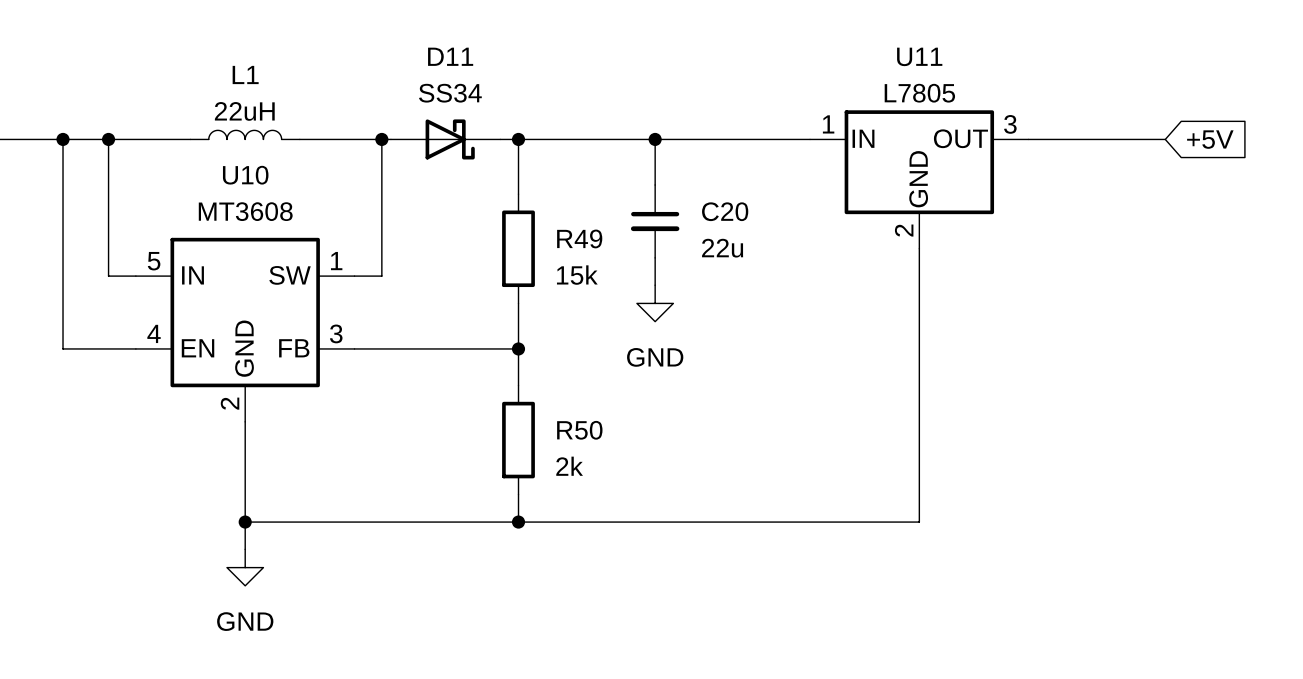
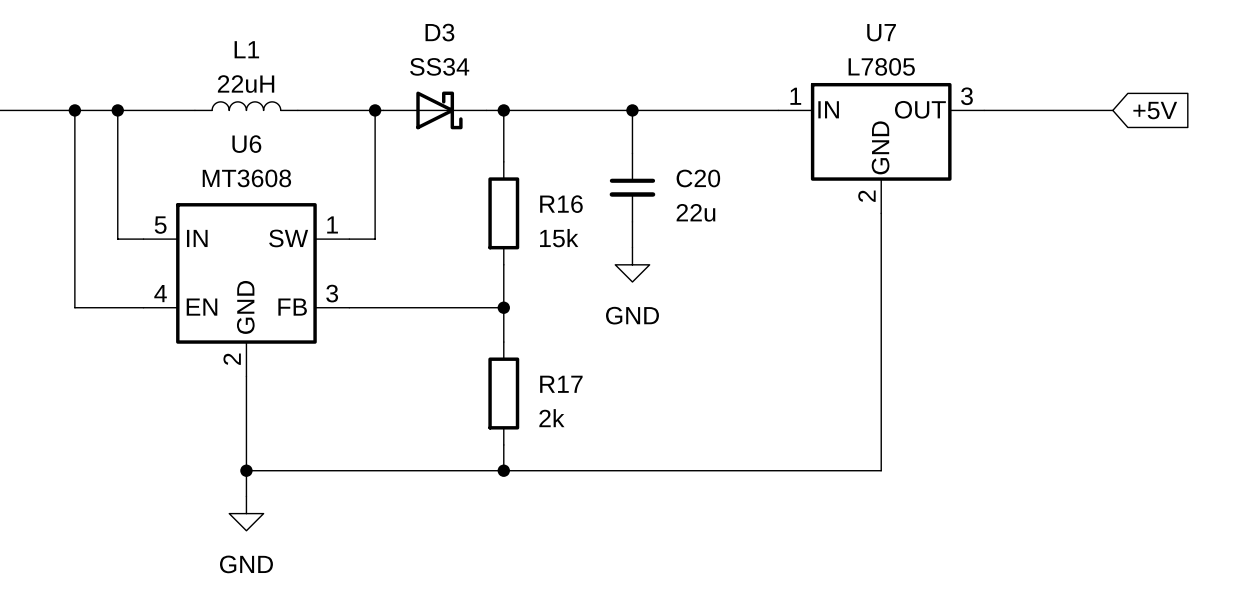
D11 name: D11 (450, 56) -> D3 (439, 32)
U11 name: U11 (919, 56) -> U7 (881, 32)
U10 name: U10 (245, 175) -> U6 (246, 144)
R49 name: R49 (579, 238) -> R16 (561, 204)
R50 name: R50 (579, 430) -> R17 (561, 384)

